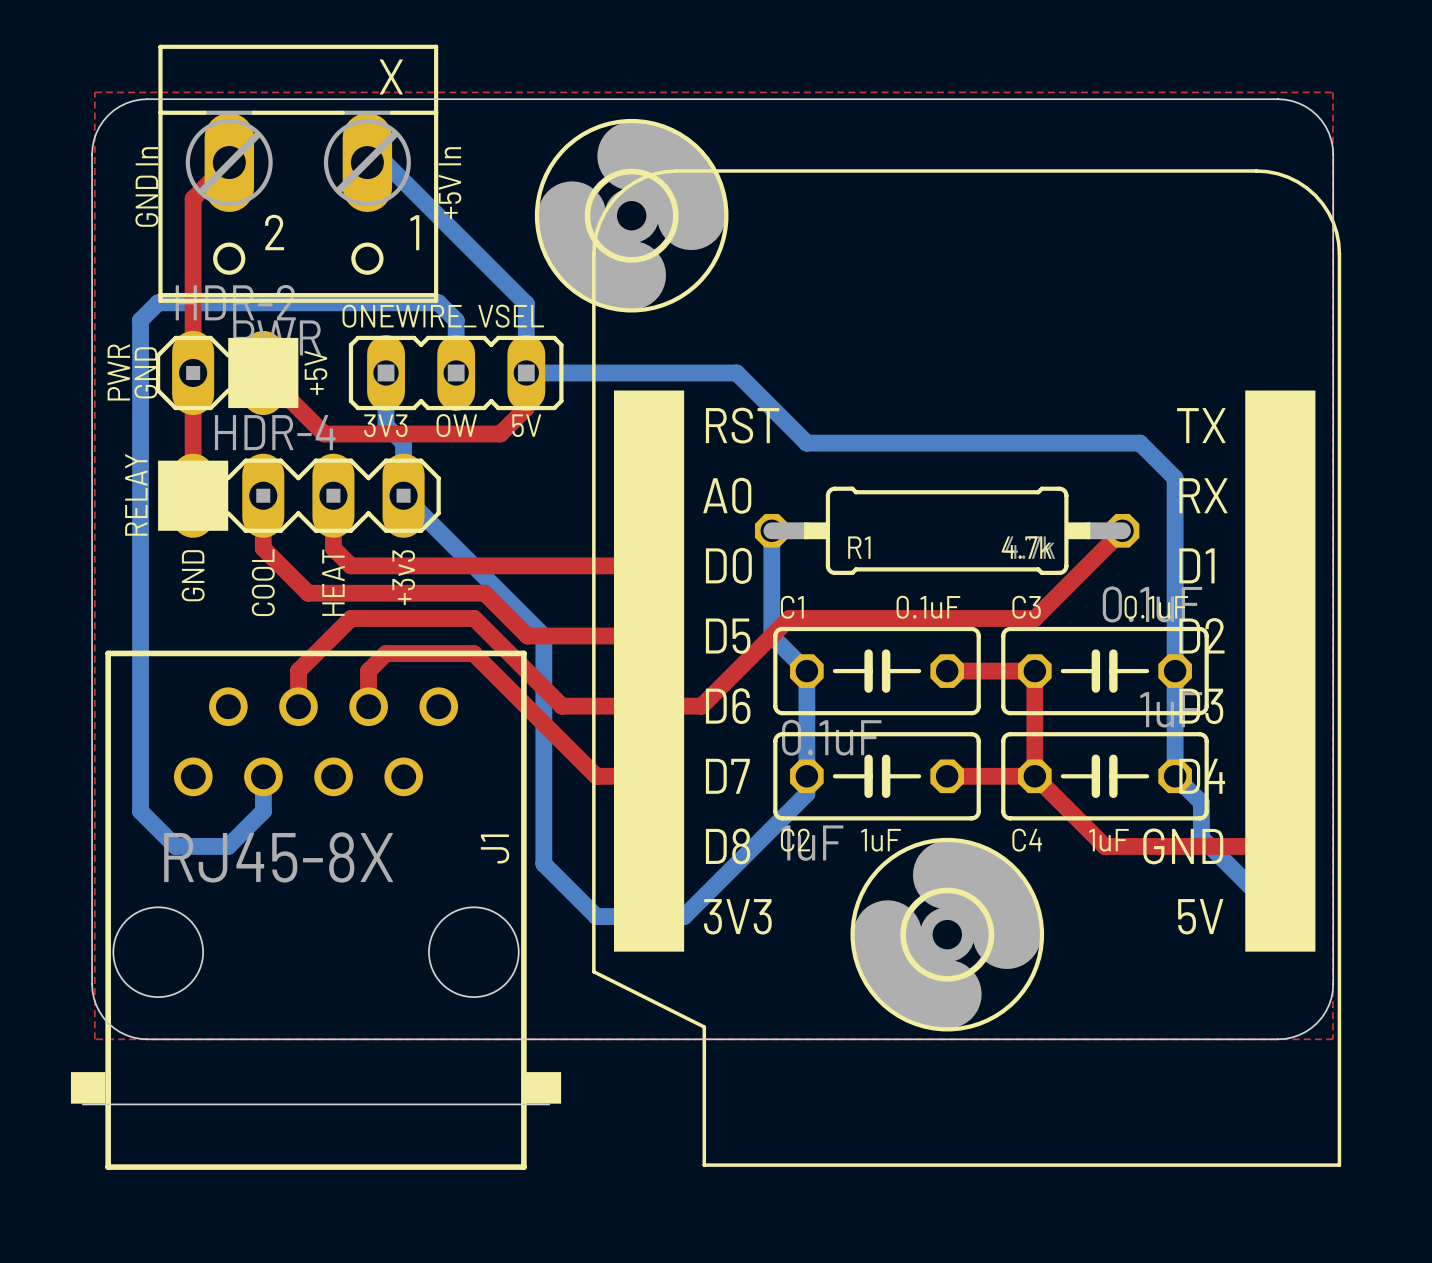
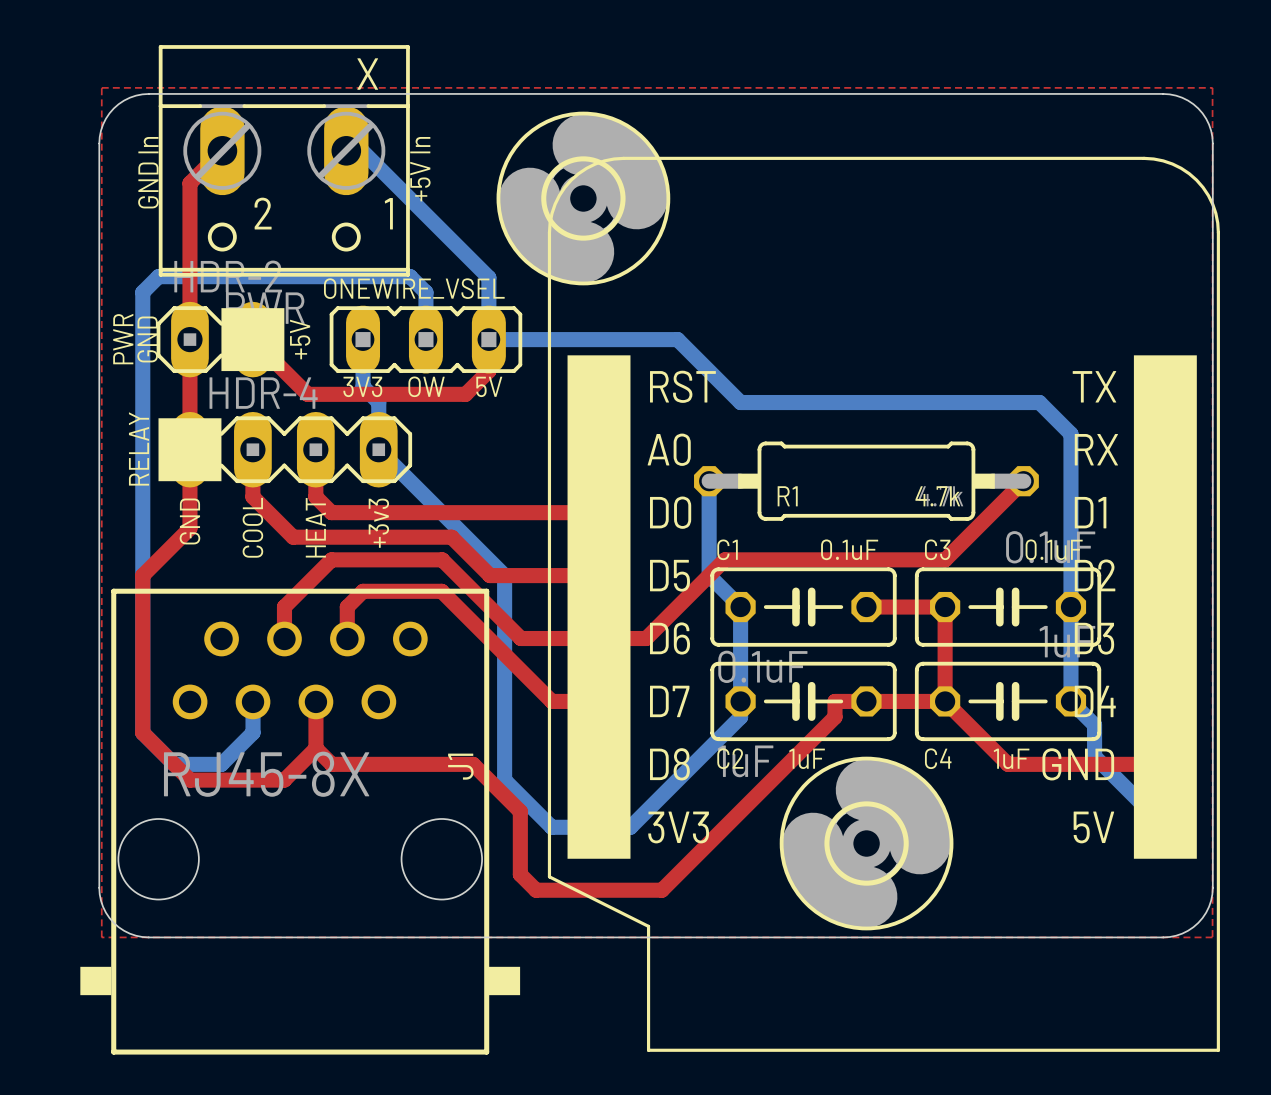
top track: none -> (189, 449) (189, 528) (142, 575) (142, 732) (189, 780) (284, 780) (315, 748)
J1 footprint: [70, 650, 562, 1170] -> [80, 588, 521, 1055]
top track: none -> (315, 701) (315, 748)
top track: none -> (866, 701) (834, 701) (834, 717) (661, 890) (536, 890) (520, 874) (520, 811) (473, 764) (331, 764) (315, 748)

